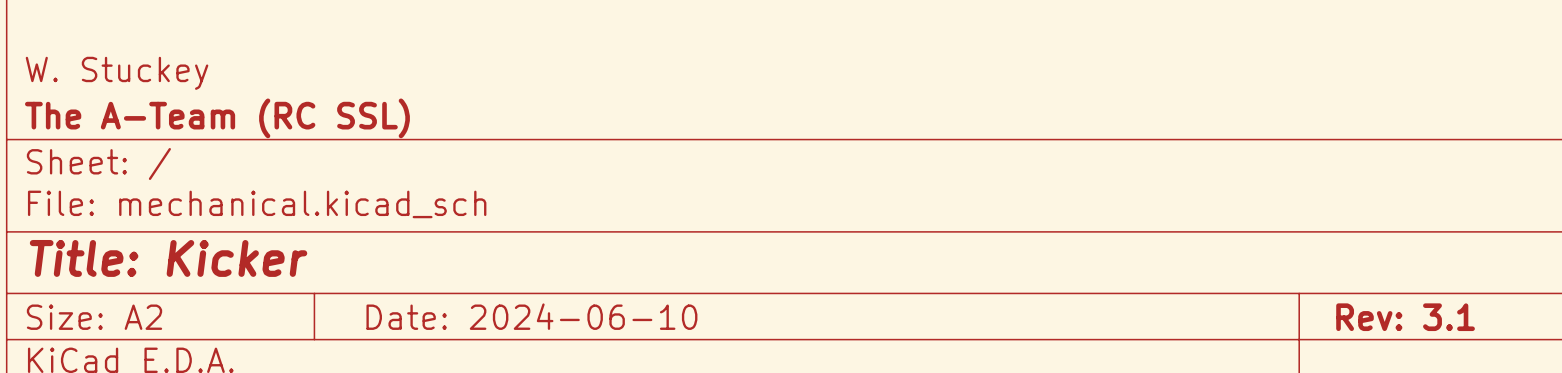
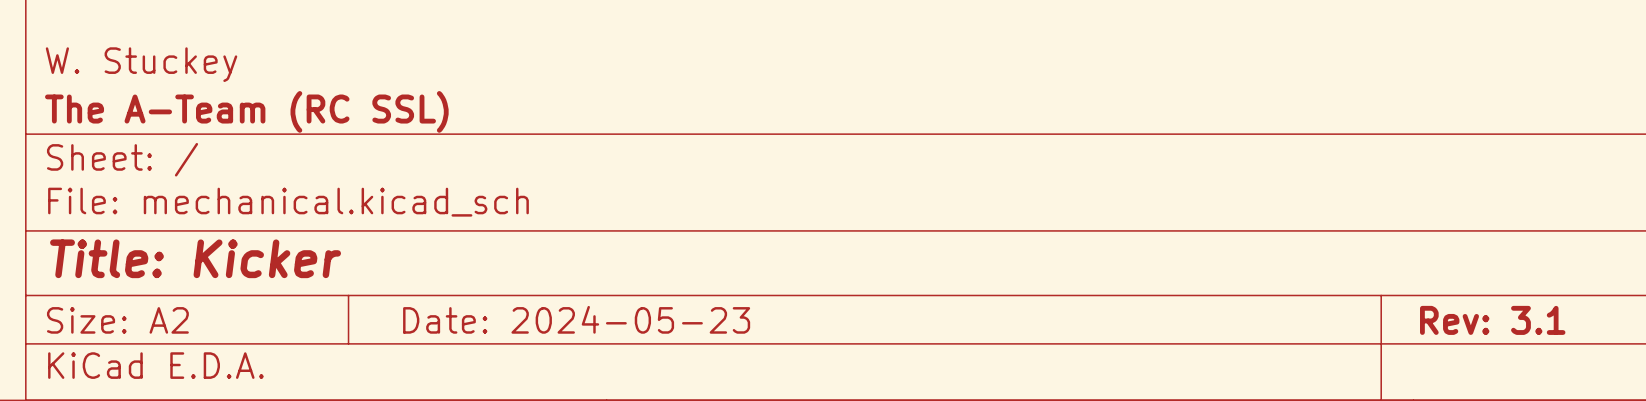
title block: Date: 2024-06-10 (531, 316) -> Date: 2024-05-23 (576, 319)

